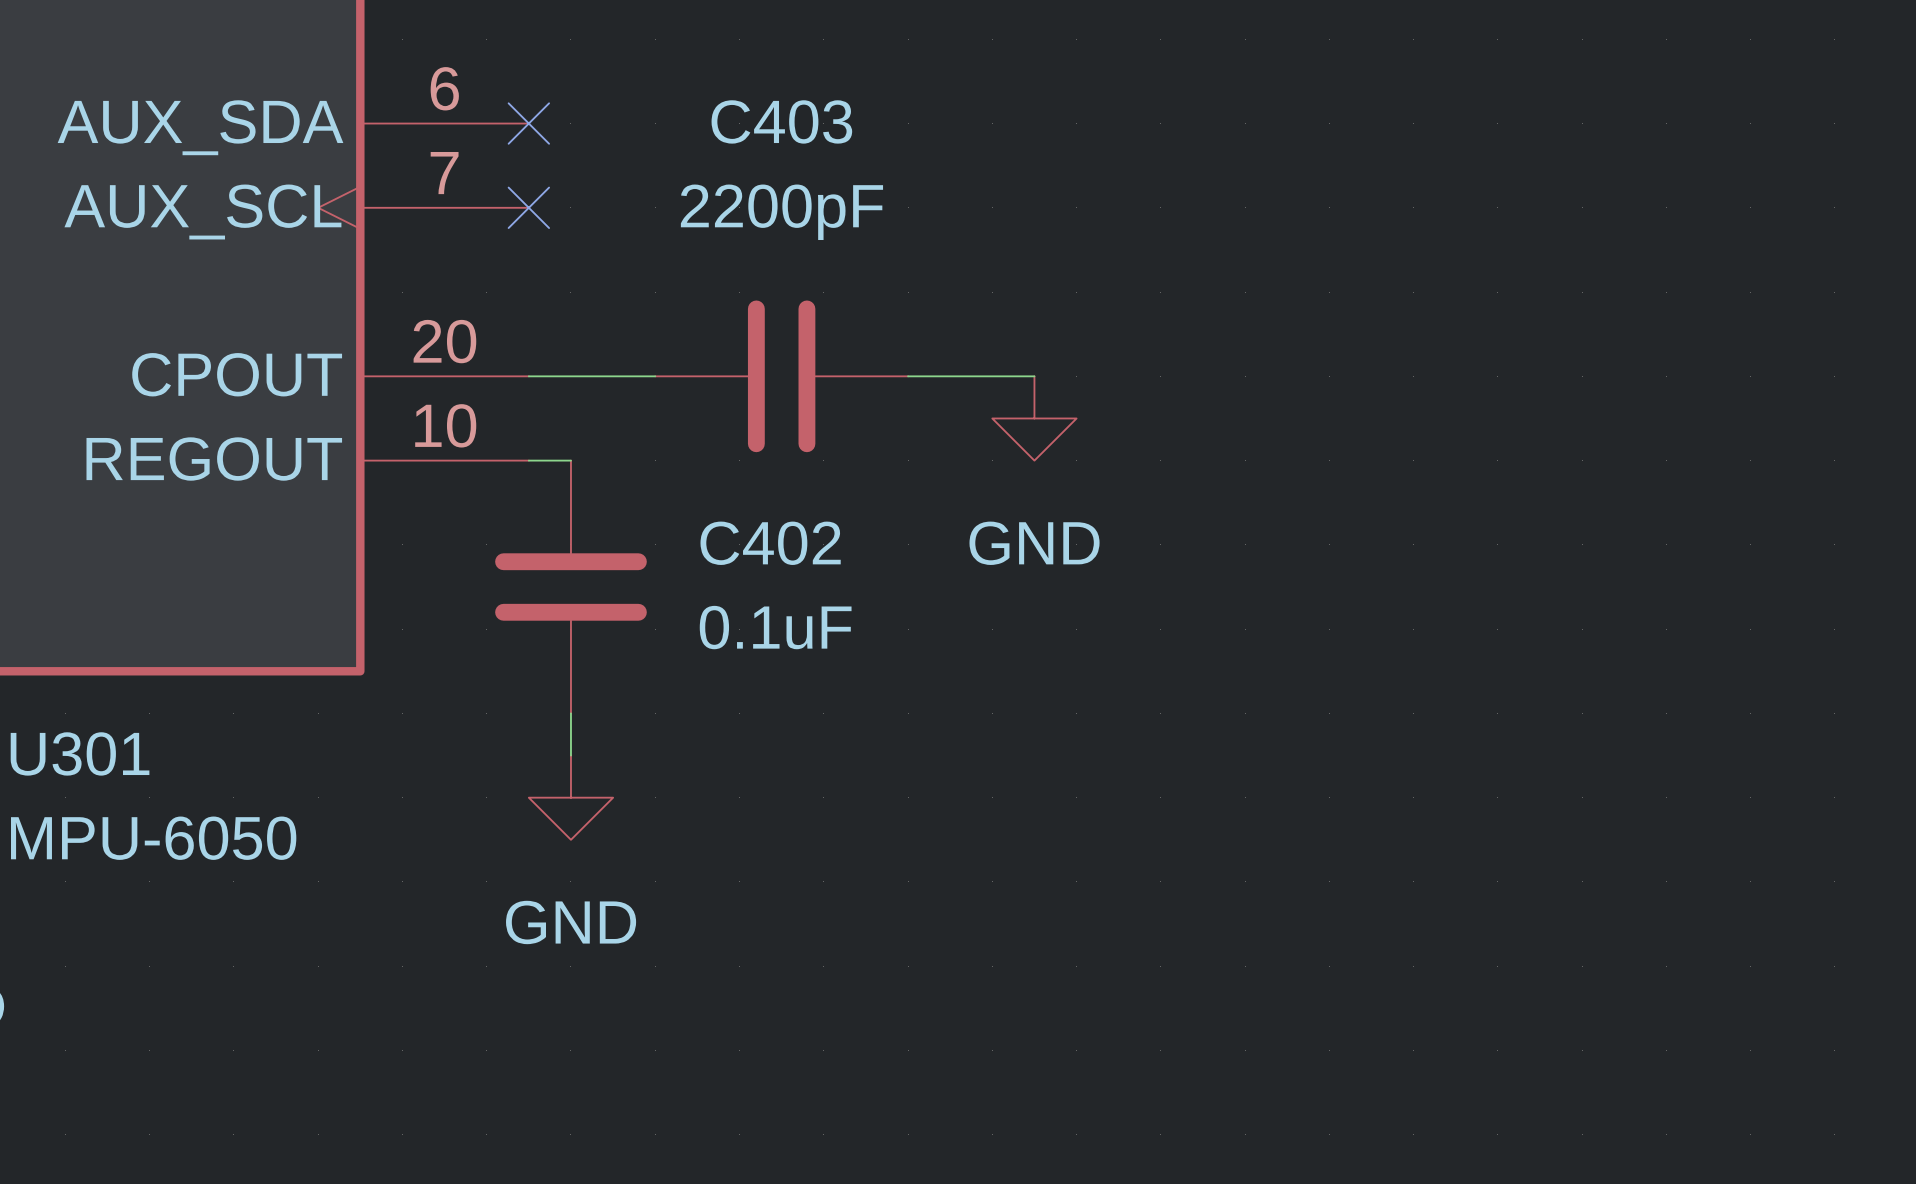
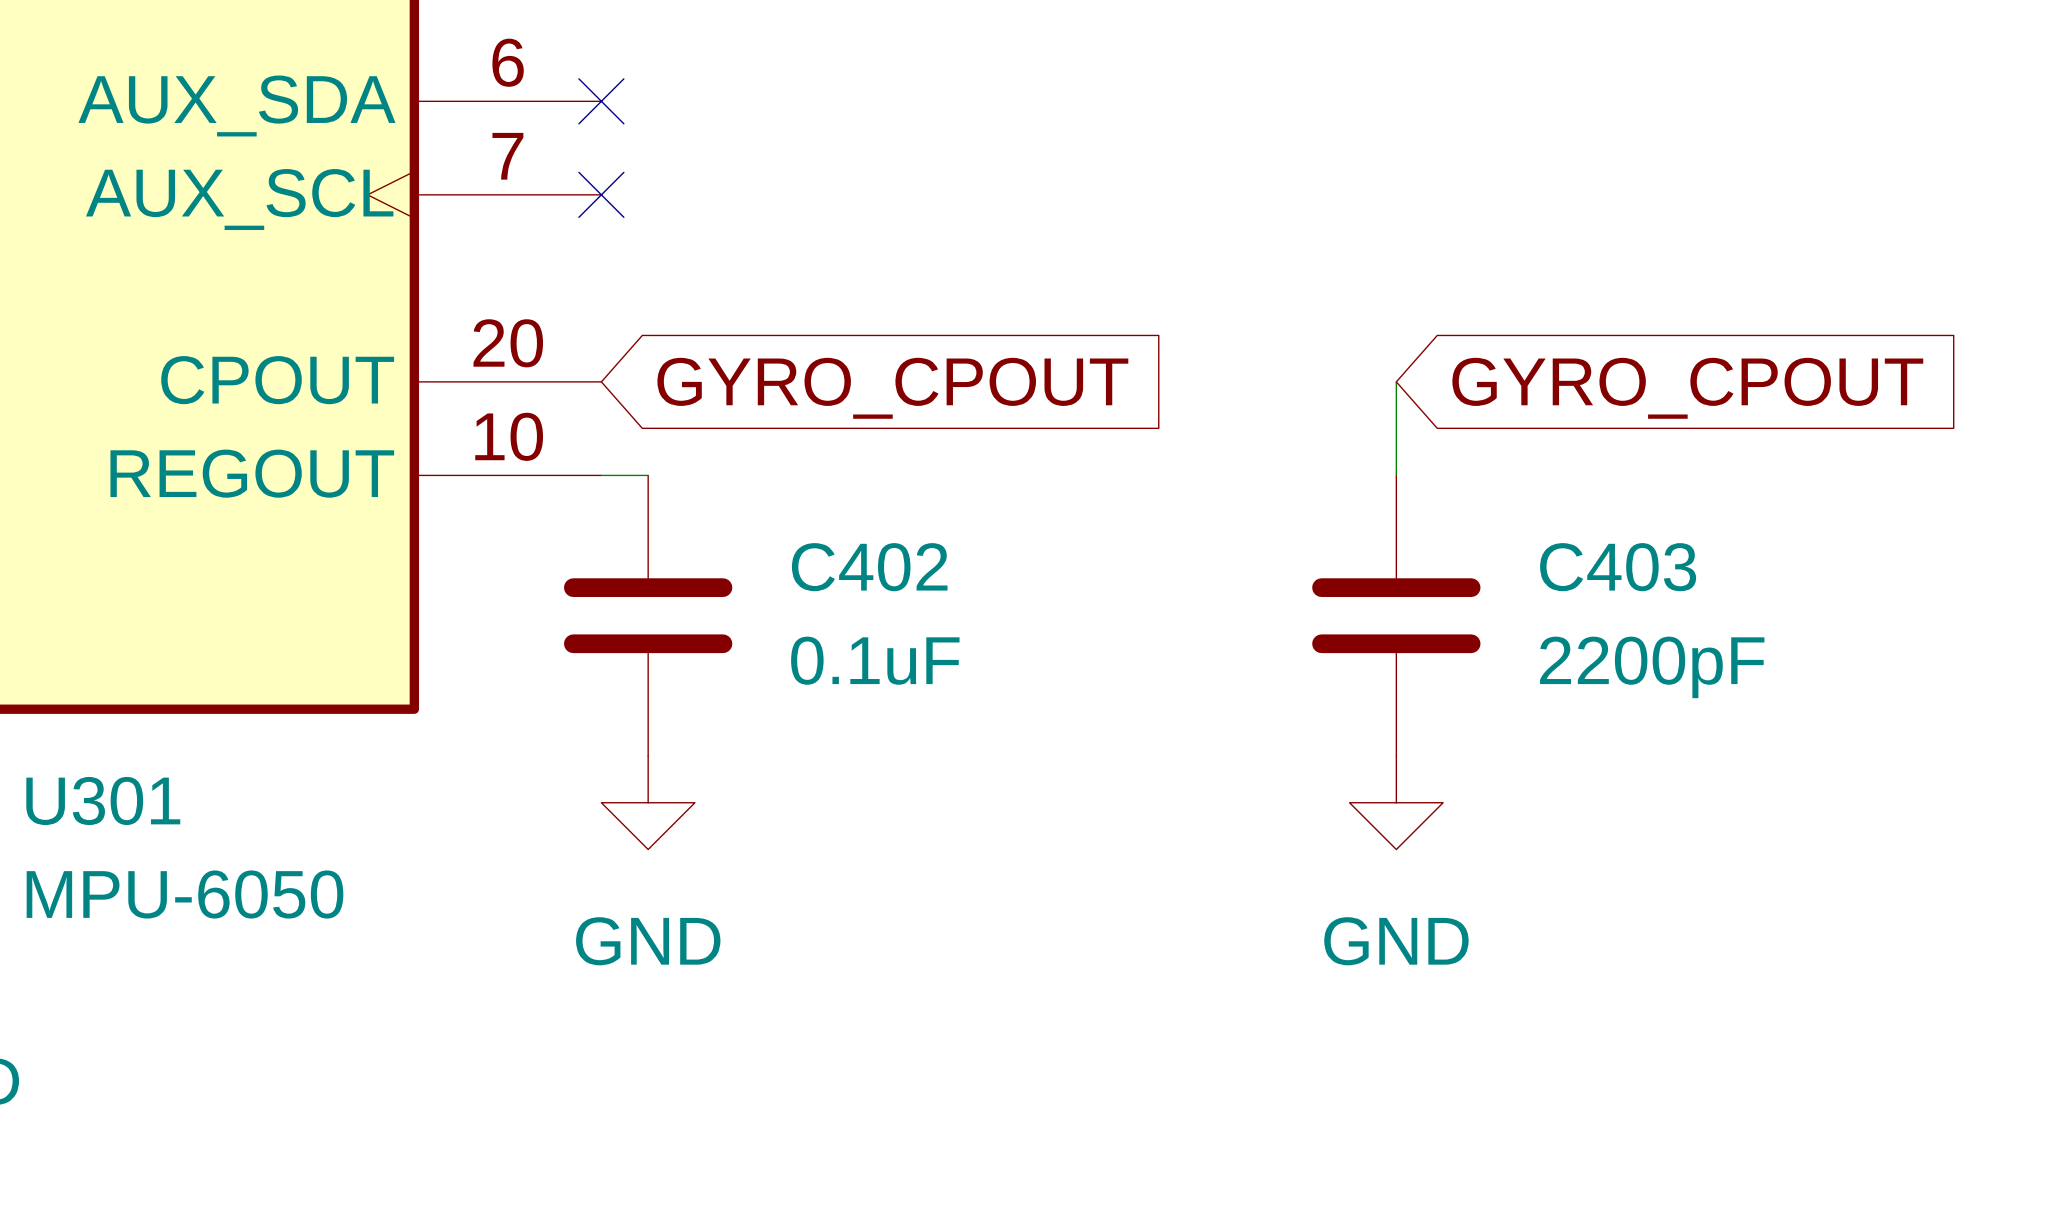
C403 value position: 2200pF (781, 212) -> 2200pF (1652, 667)
wire: (528, 376) (655, 376) -> none
C403 rotation: 0° (781, 376) -> 90° clockwise (1396, 615)
C403 position: (781, 376) -> (1396, 615)
wire: (908, 376) (1034, 376) -> none
wire: none -> (1396, 381) (1396, 475)
global label: none -> GYRO_CPOUT (892, 388)
global label: none -> GYRO_CPOUT (1687, 388)
power symbol: GND (1034, 418) -> none
power symbol: none -> GND (1396, 802)
power symbol position: GND (570, 797) -> GND (648, 802)

